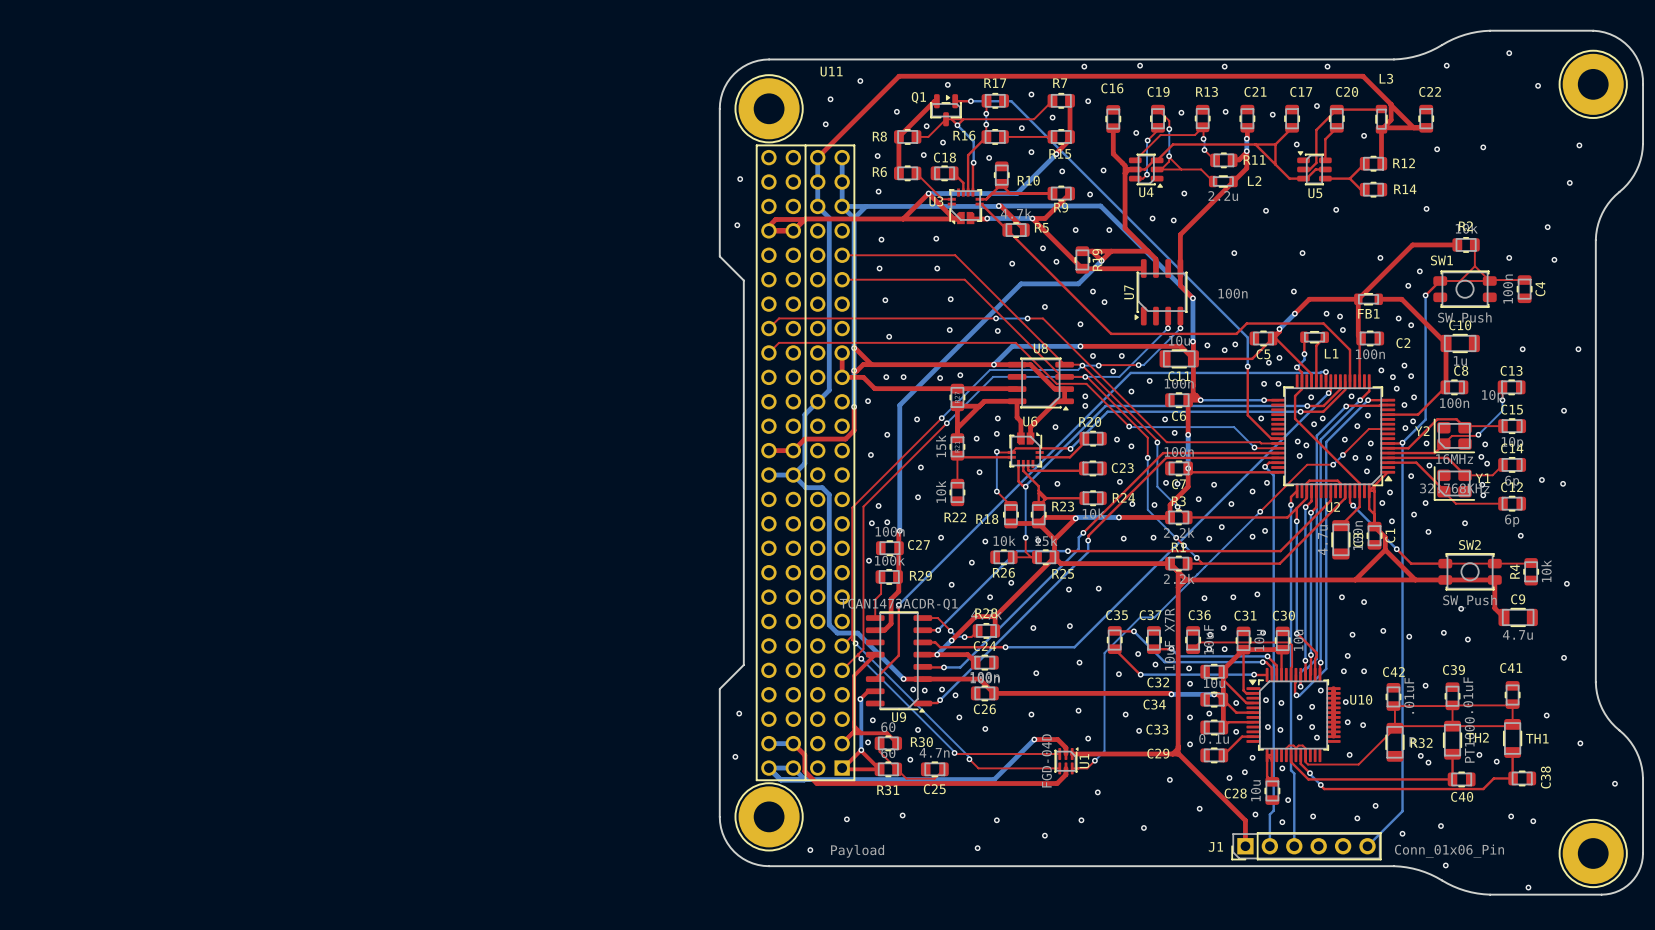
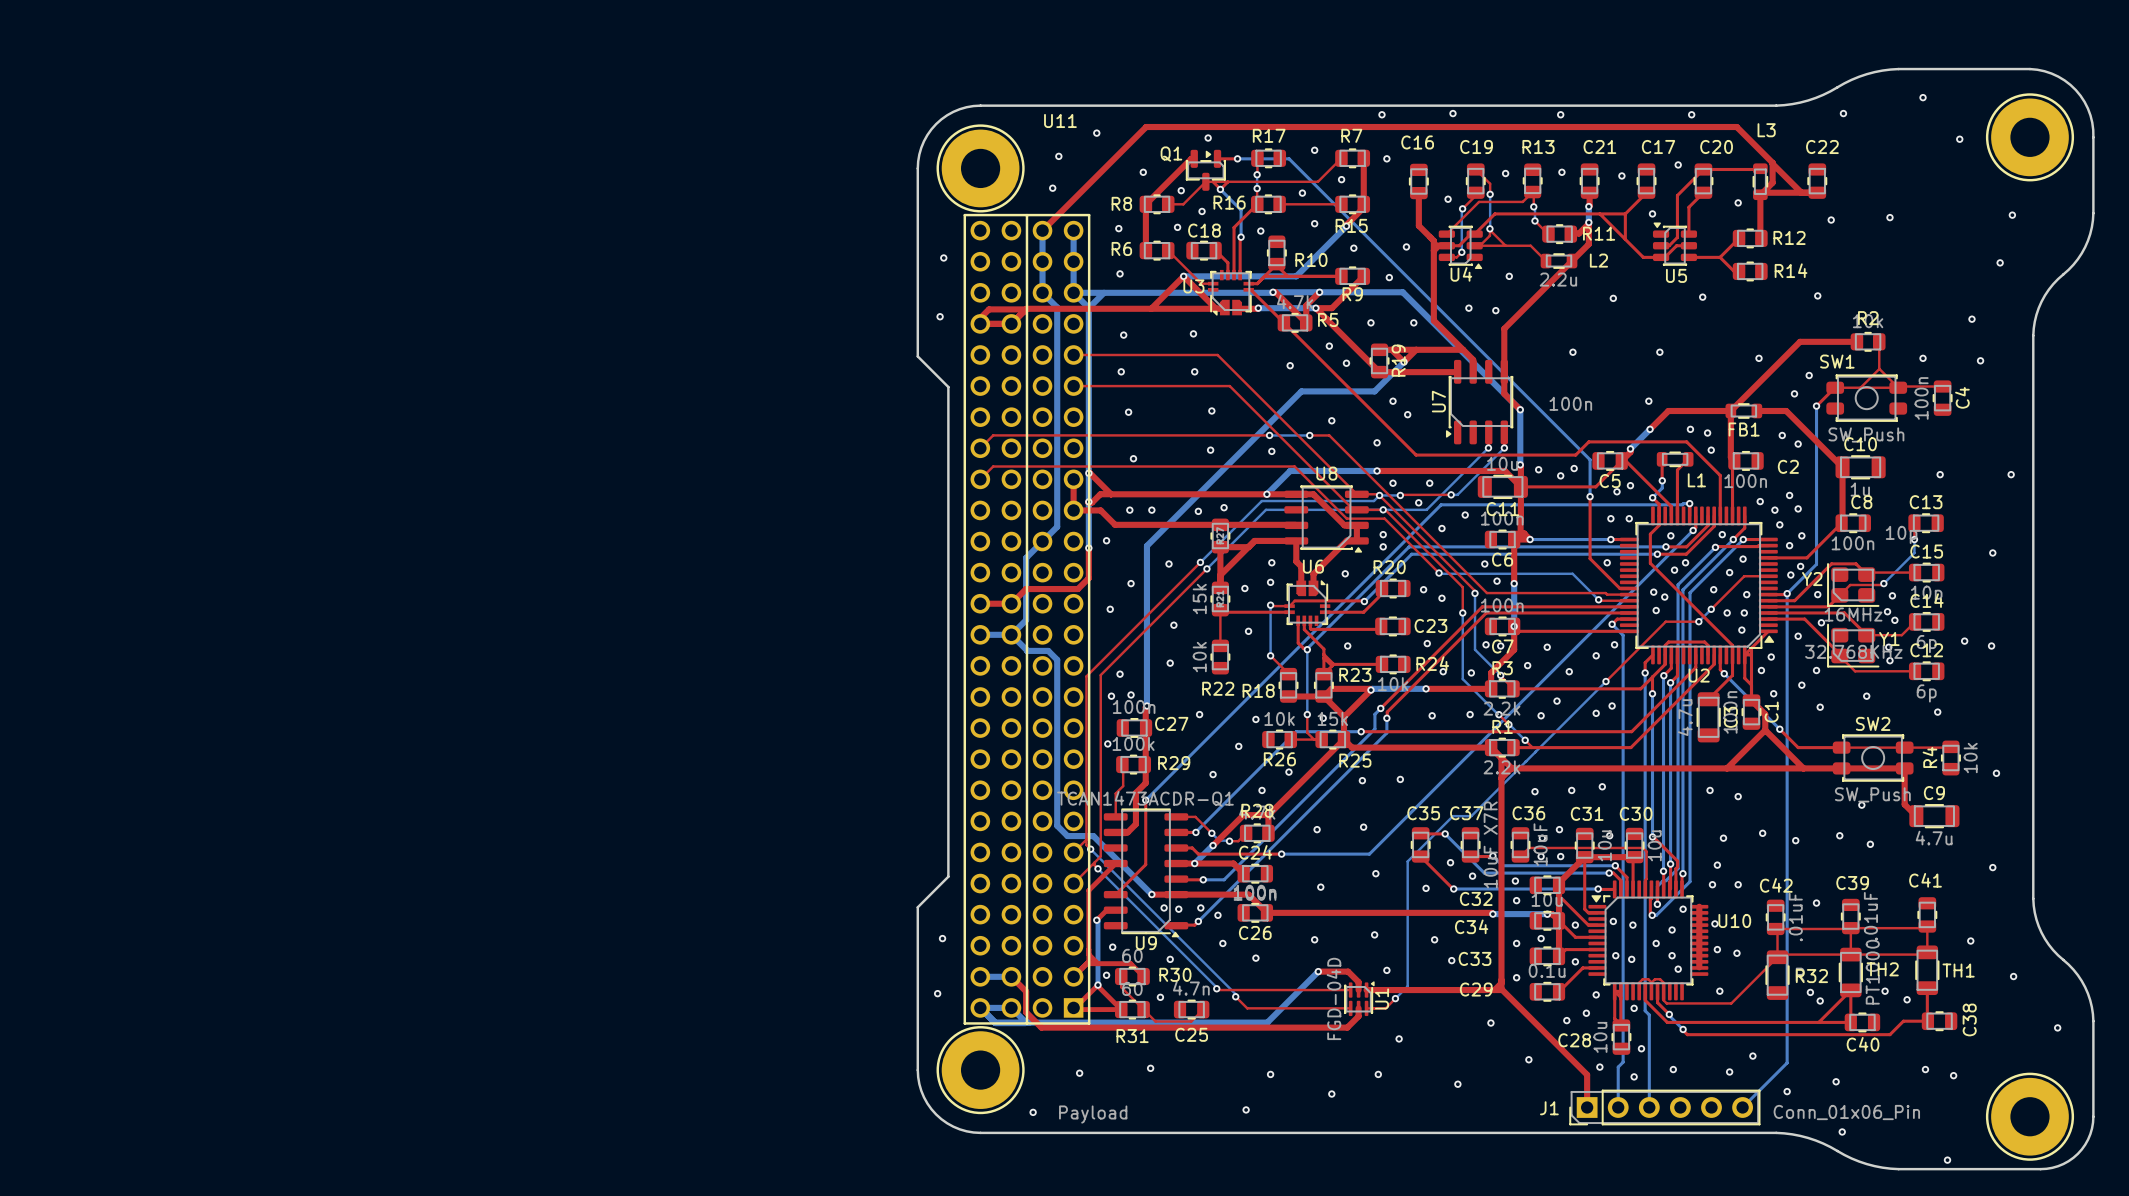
top track: none -> (1319, 292) (1306, 305) (1306, 322)
via: none -> (1319, 292)
top track: none -> (1850, 990) (1818, 1022)

